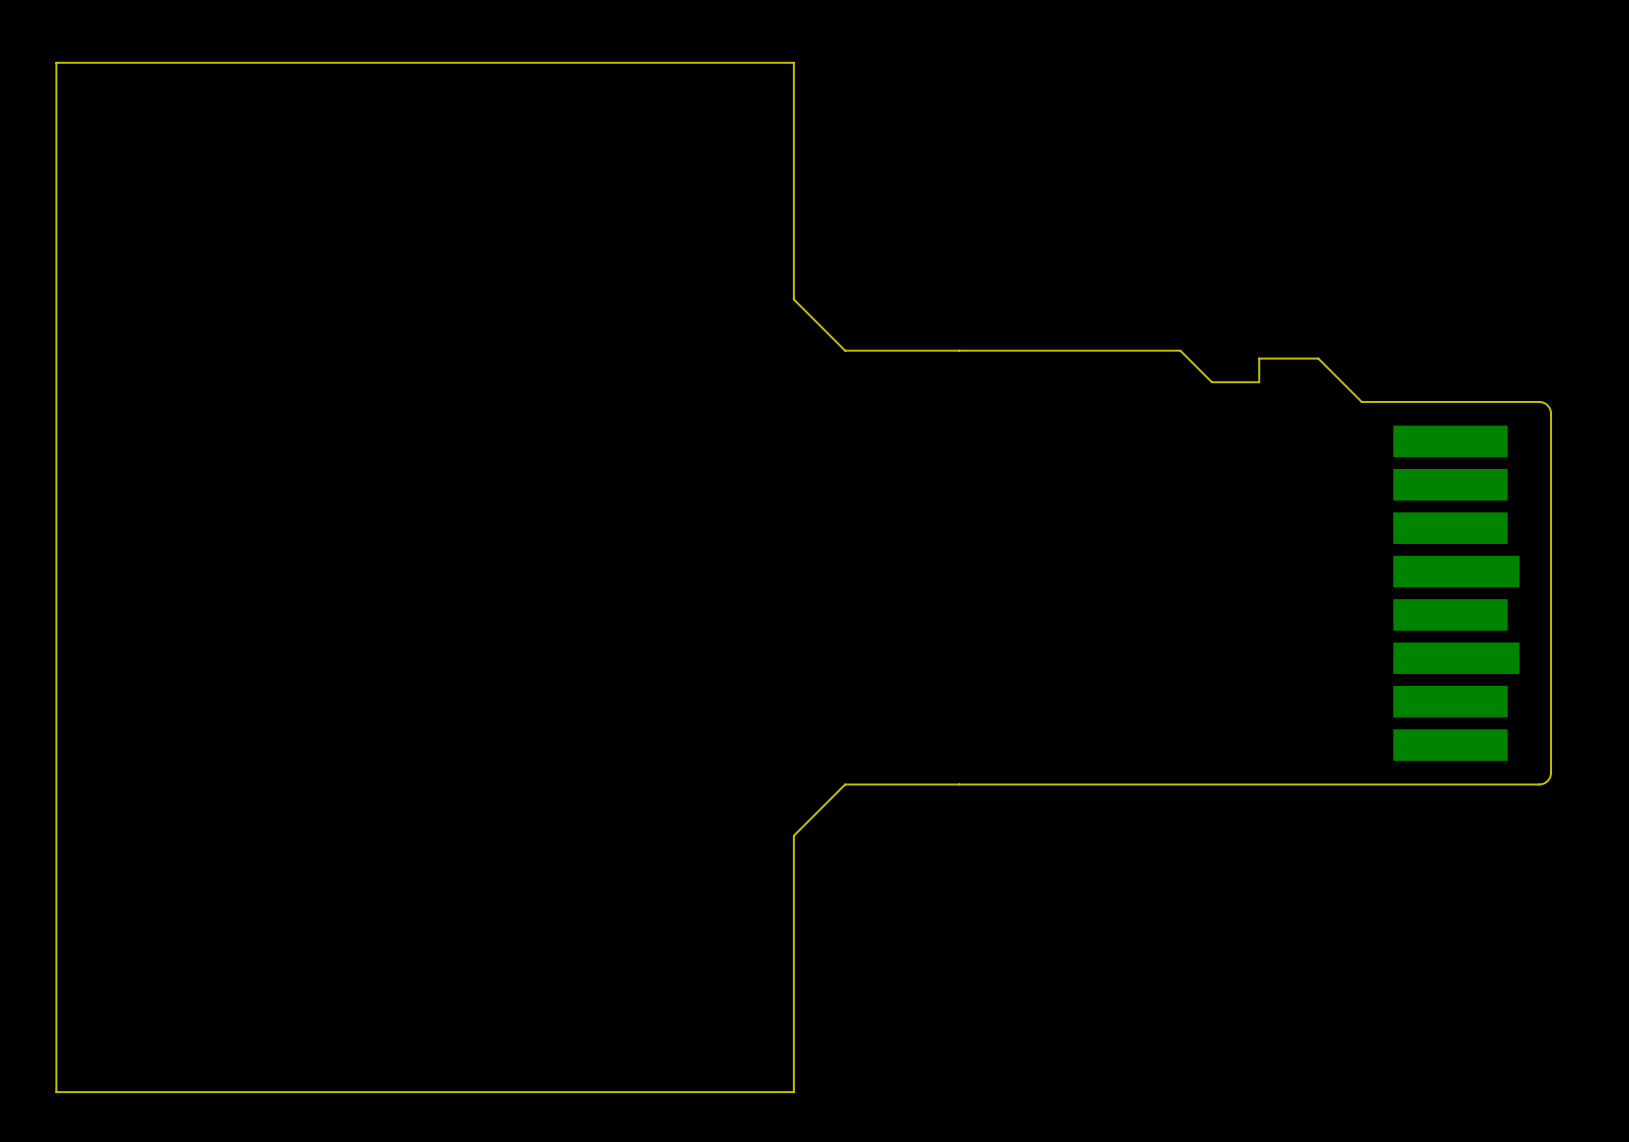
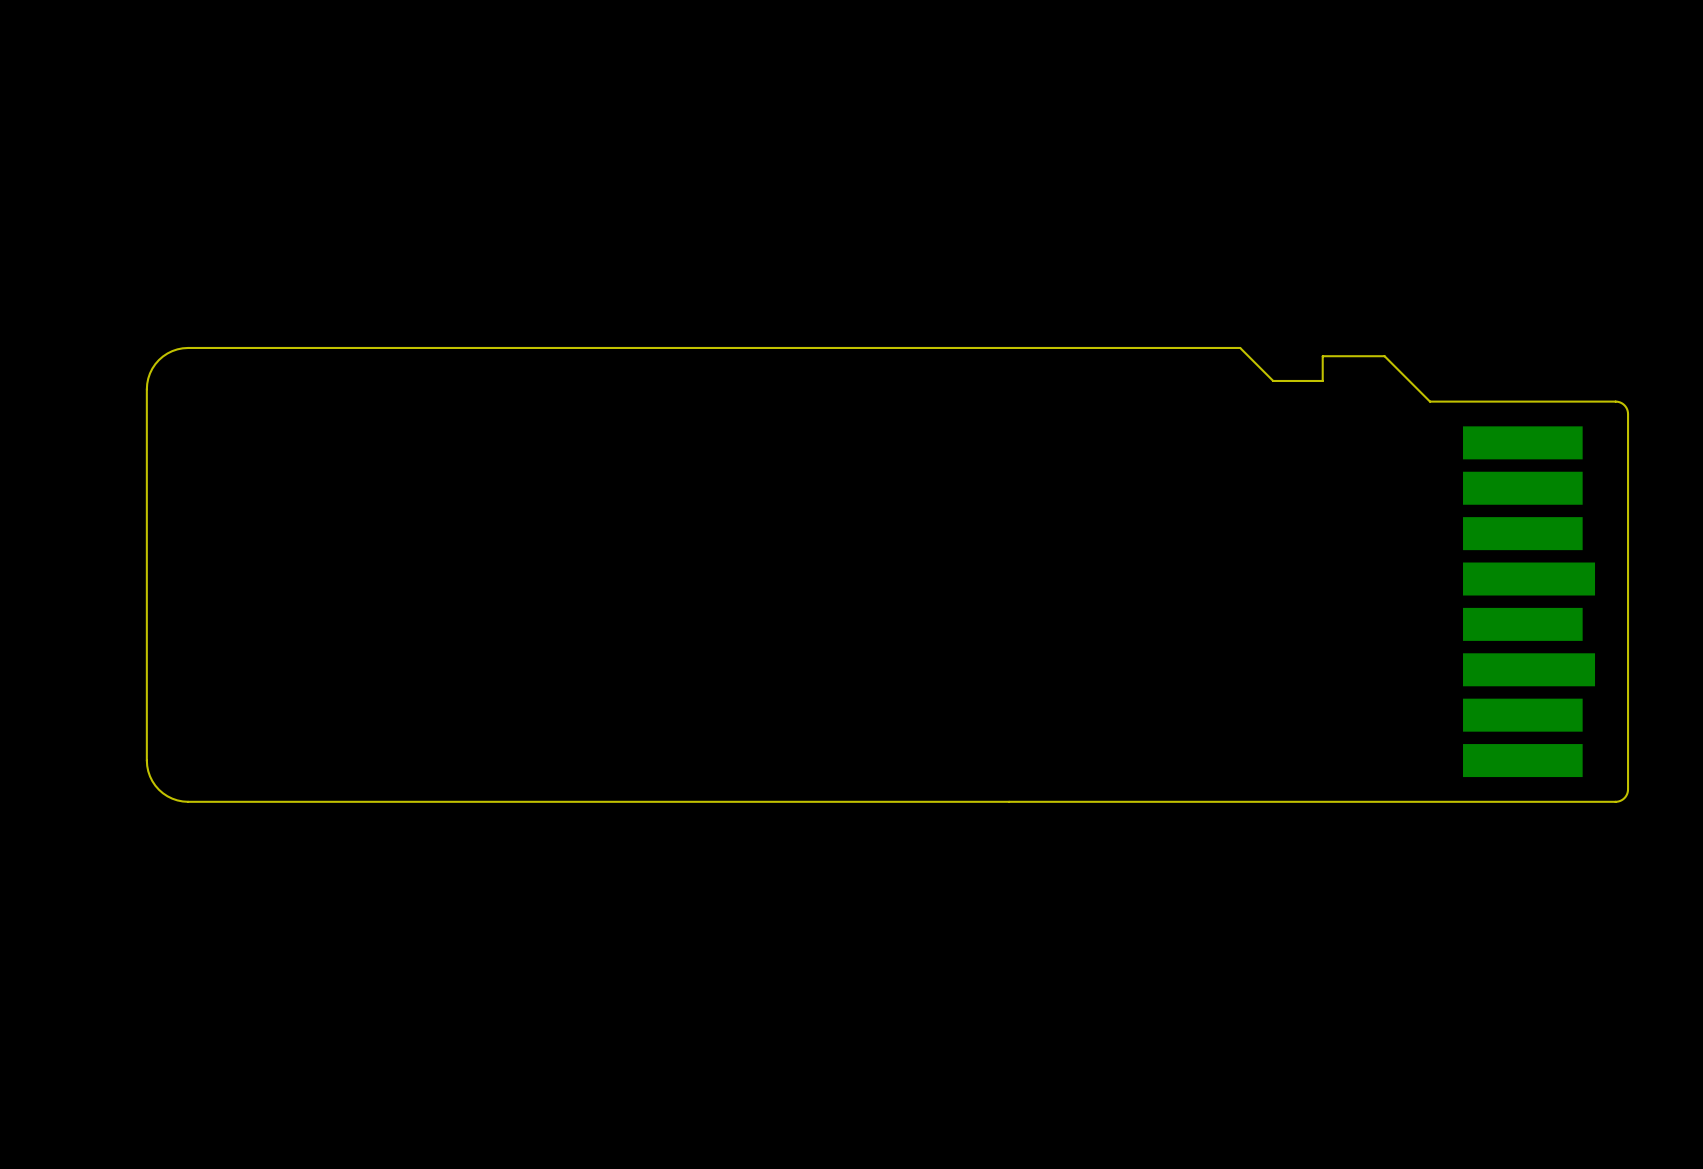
board edge: (845, 350) (793, 299) (793, 62) (56, 62) (56, 1092) (793, 1092) (793, 835) (845, 784) -> (889, 347) (188, 347) (172, 351) (158, 360) (149, 373) (146, 389) (146, 760) (152, 781) (167, 796) (188, 801) (889, 801)

